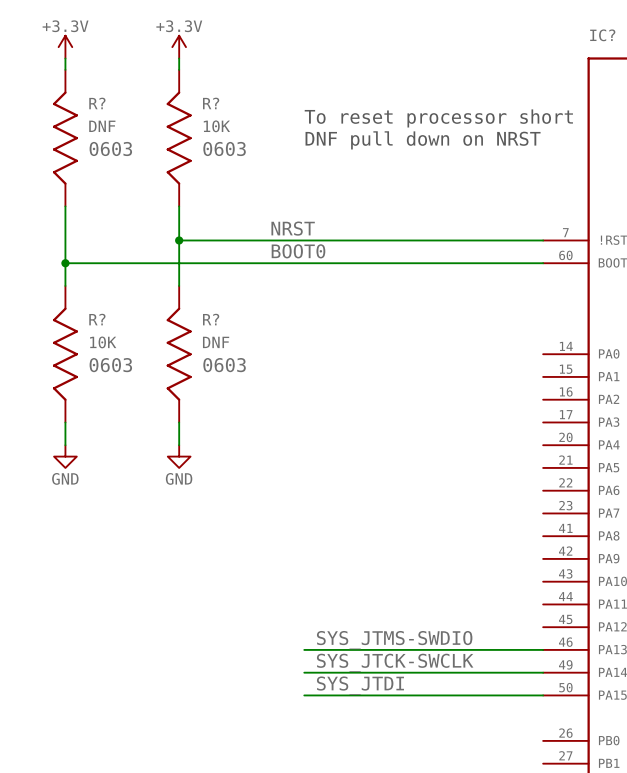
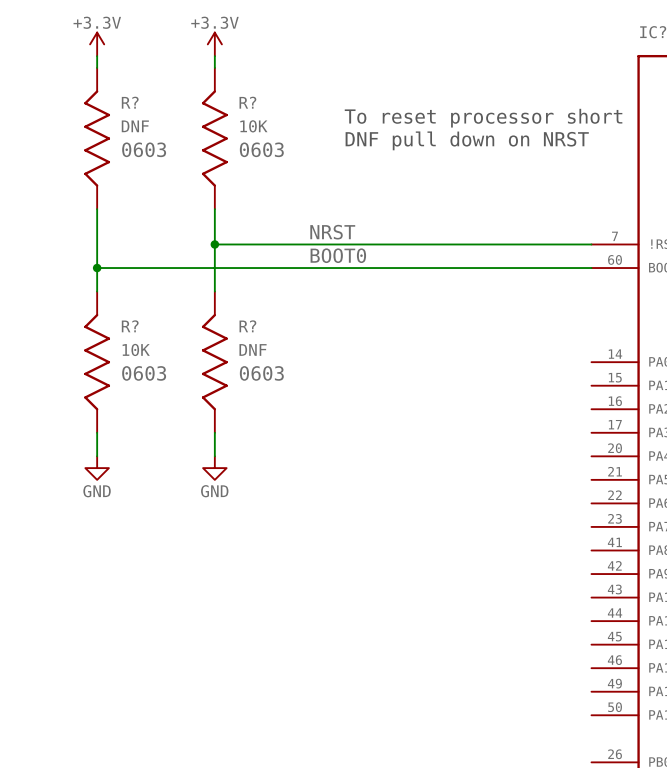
label: SYS_JTMS-SWDIO (394, 640) -> none
wire: (304, 649) (543, 649) -> none
label: SYS_JTCK-SWCLK (395, 662) -> none
wire: (304, 672) (543, 672) -> none
label: SYS_JTDI (360, 685) -> none
wire: (304, 695) (543, 695) -> none

